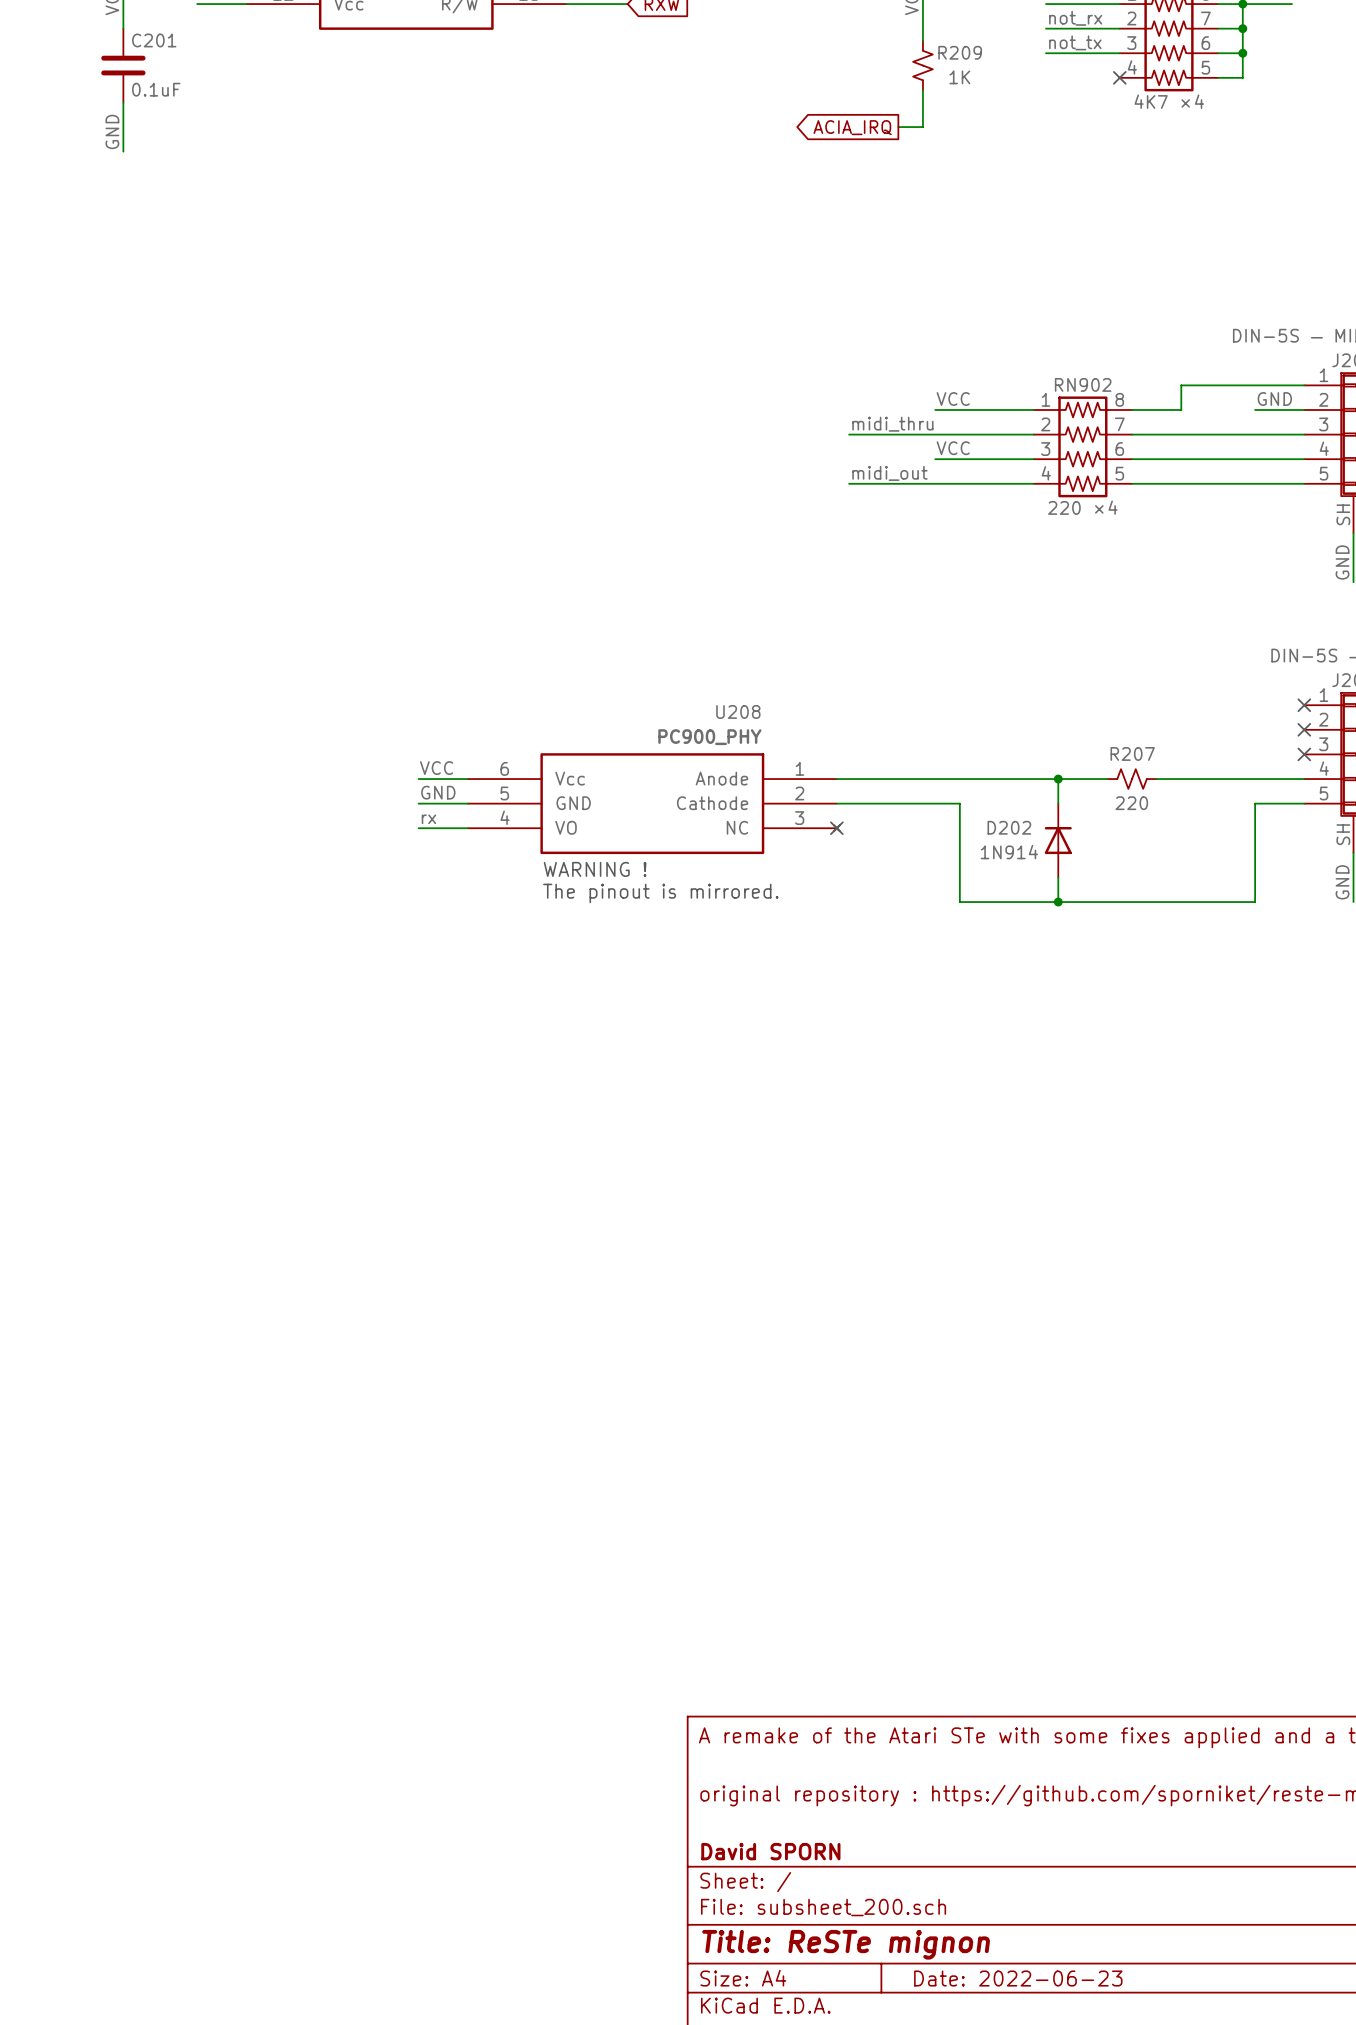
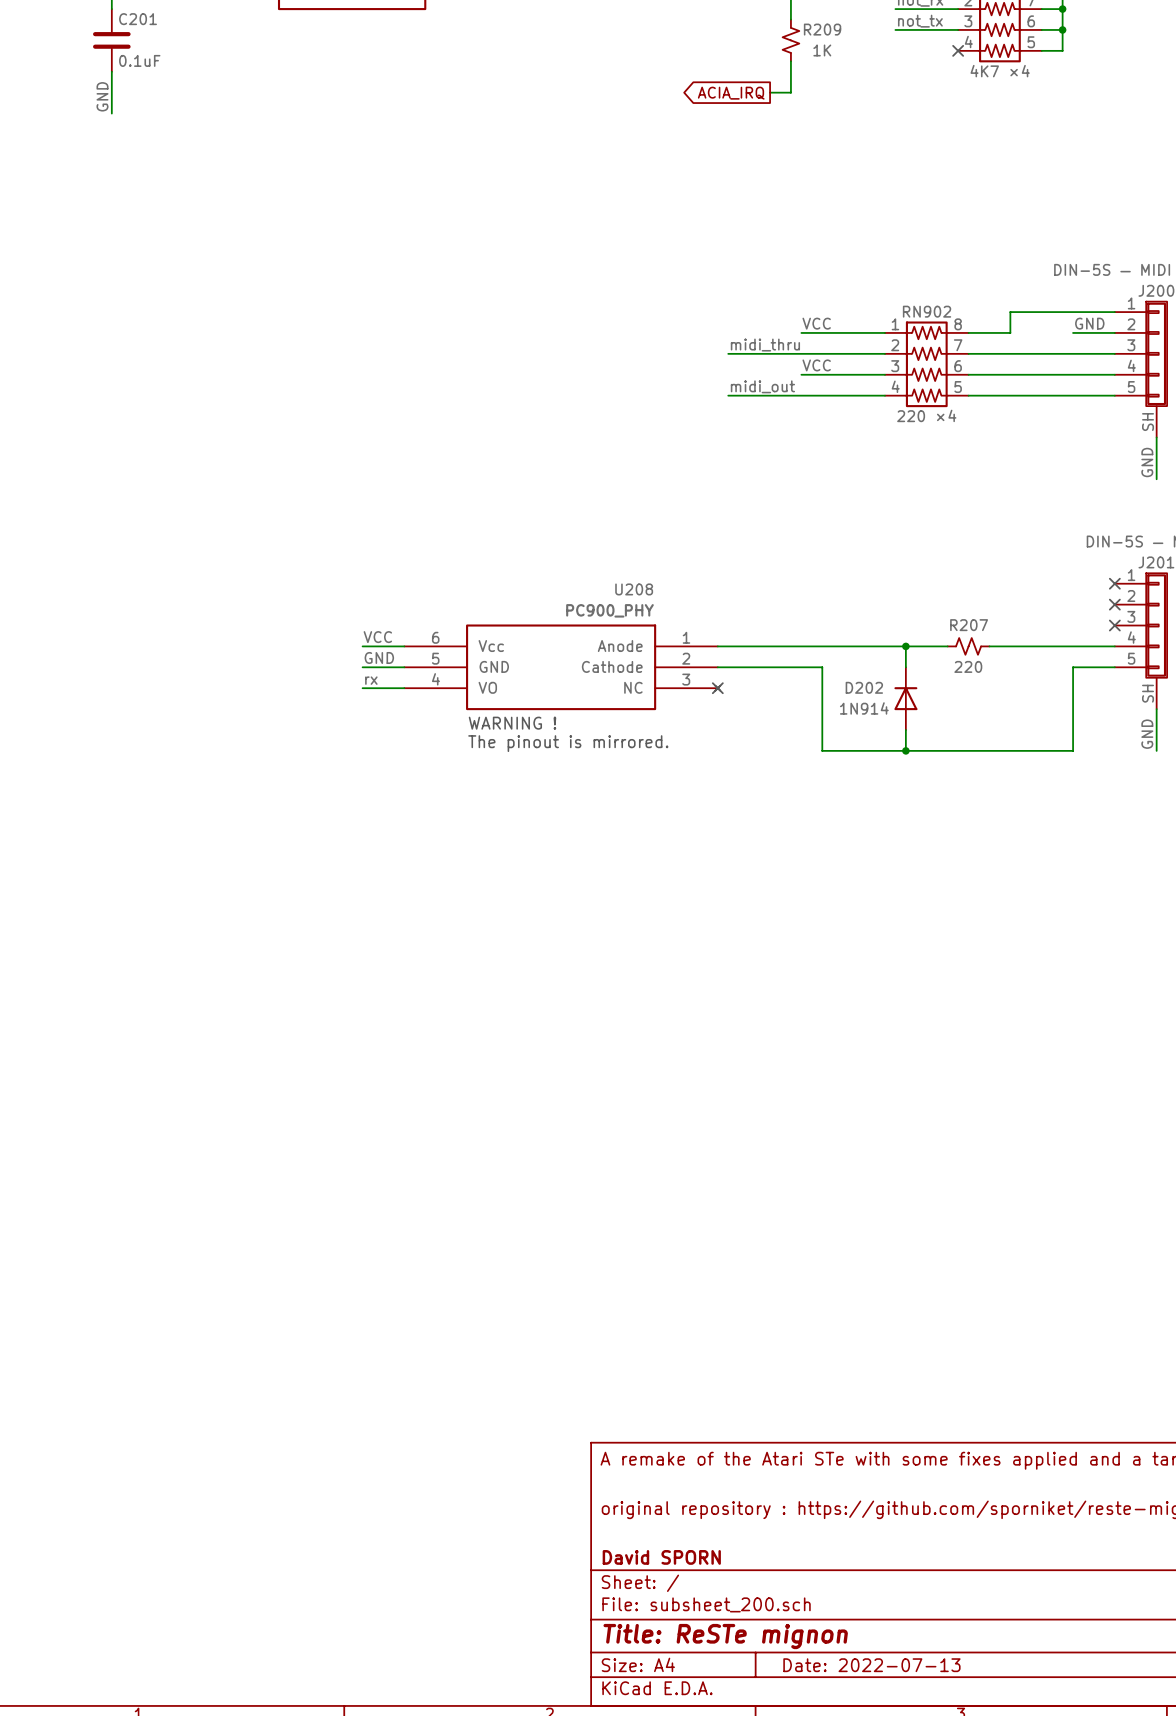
title block: Date: 2022-06-23 (1018, 1978) -> Date: 2022-07-13 (871, 1665)

